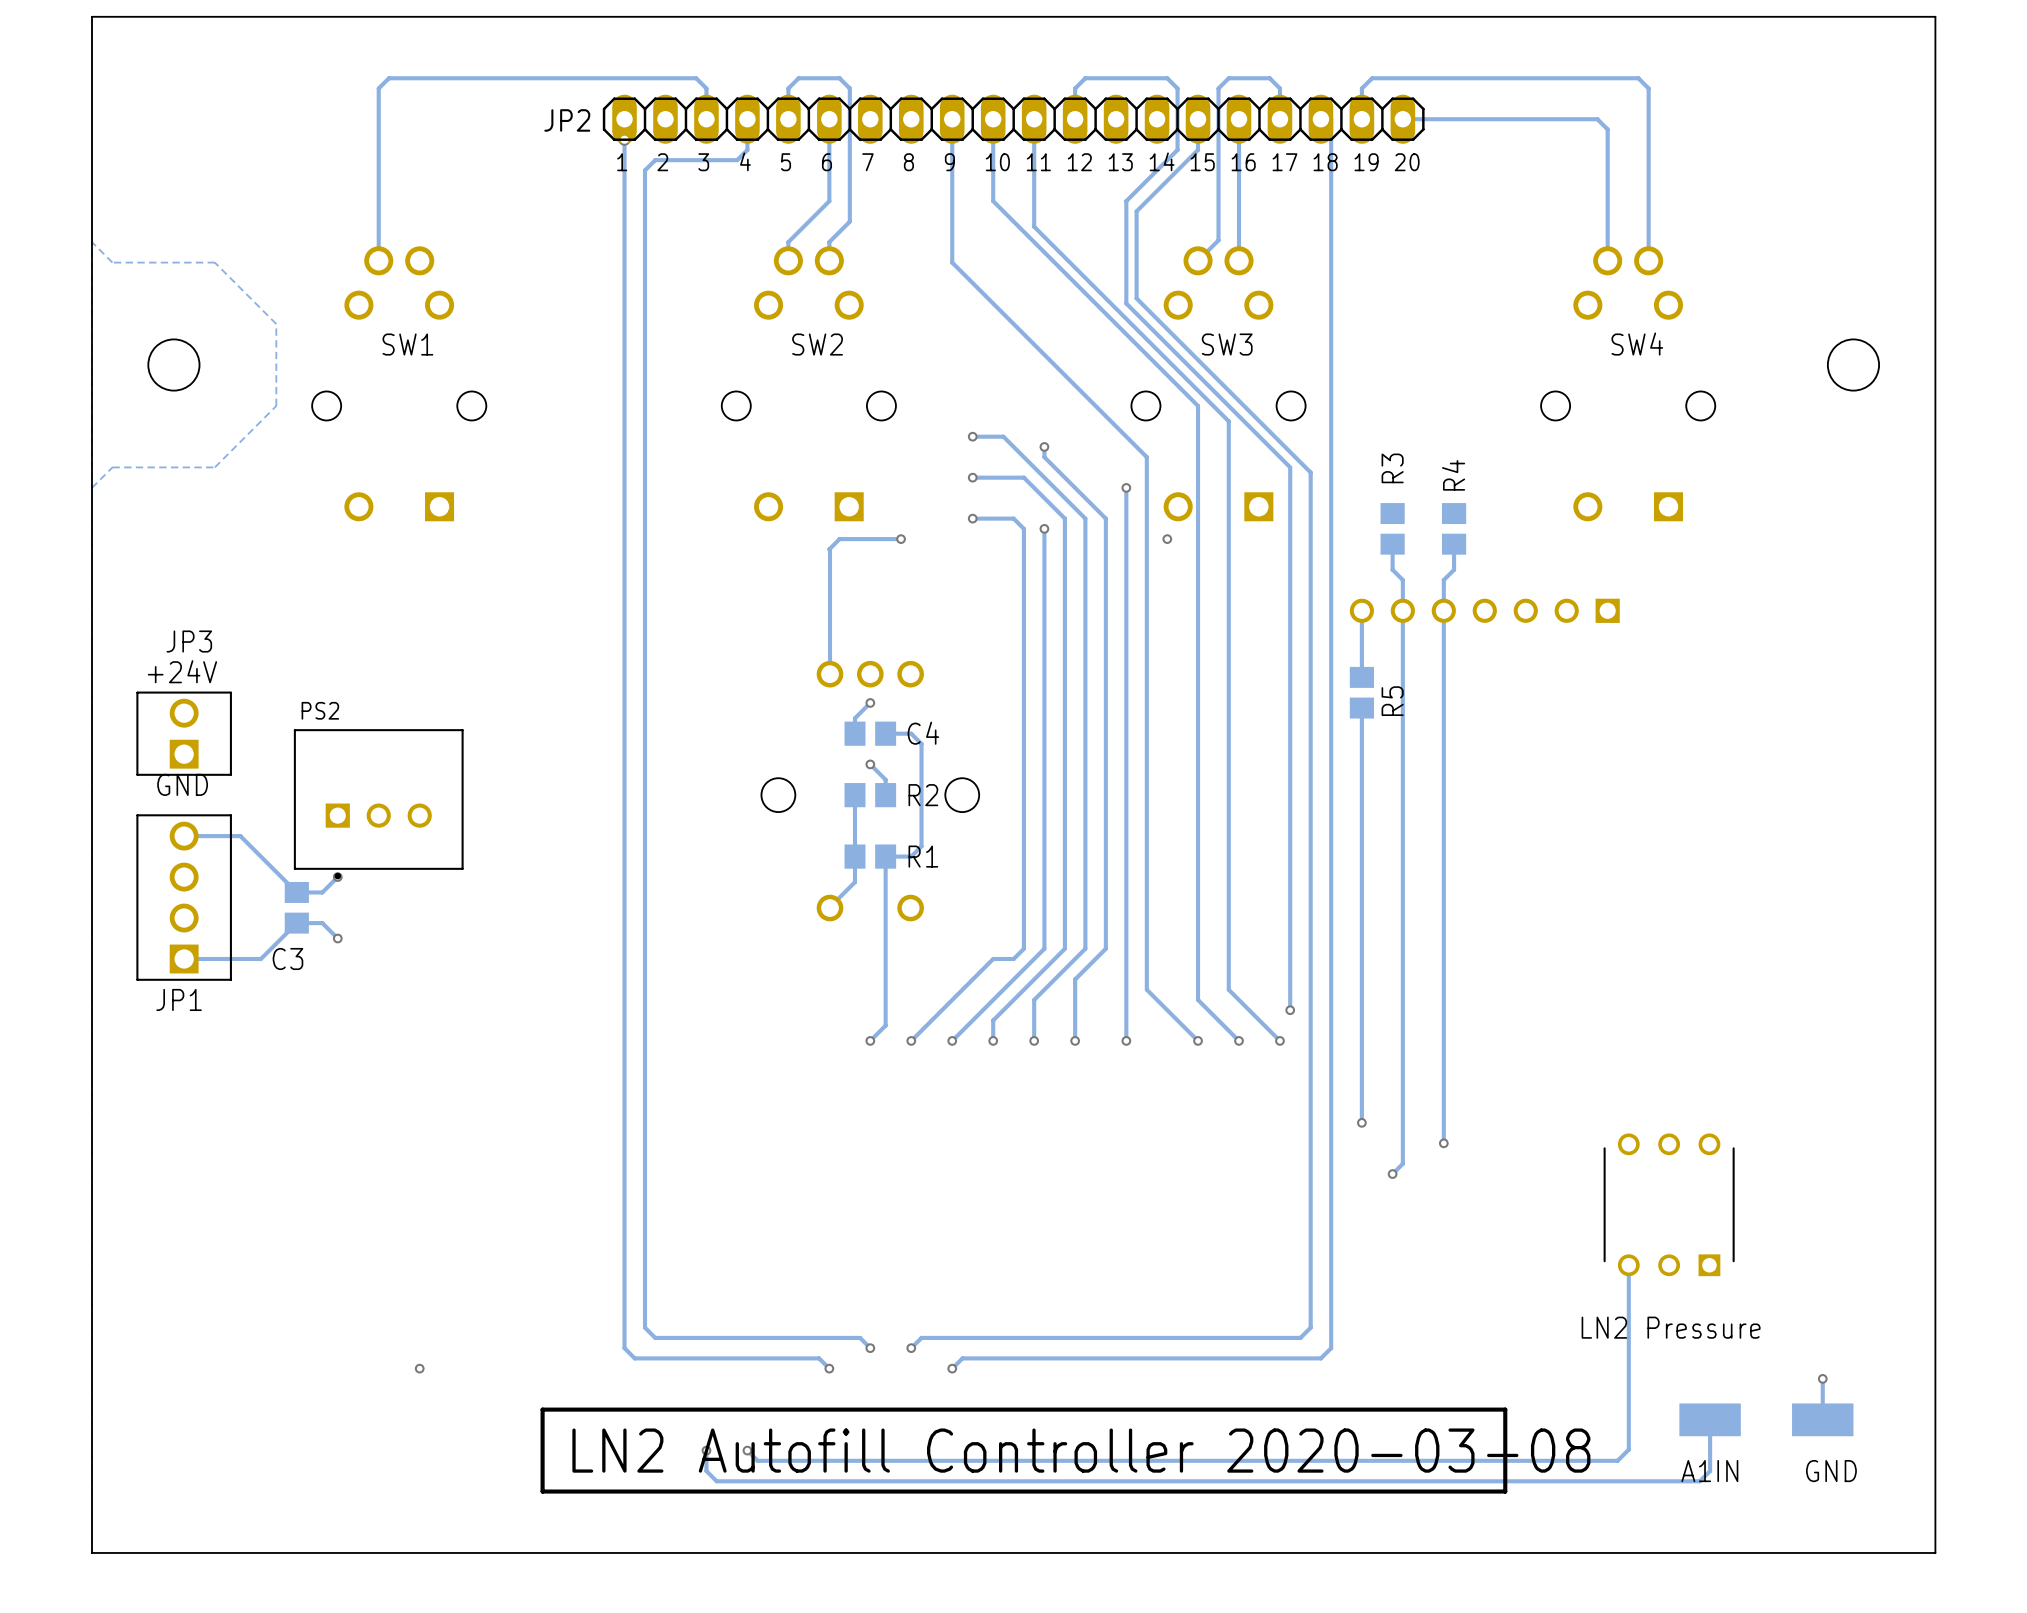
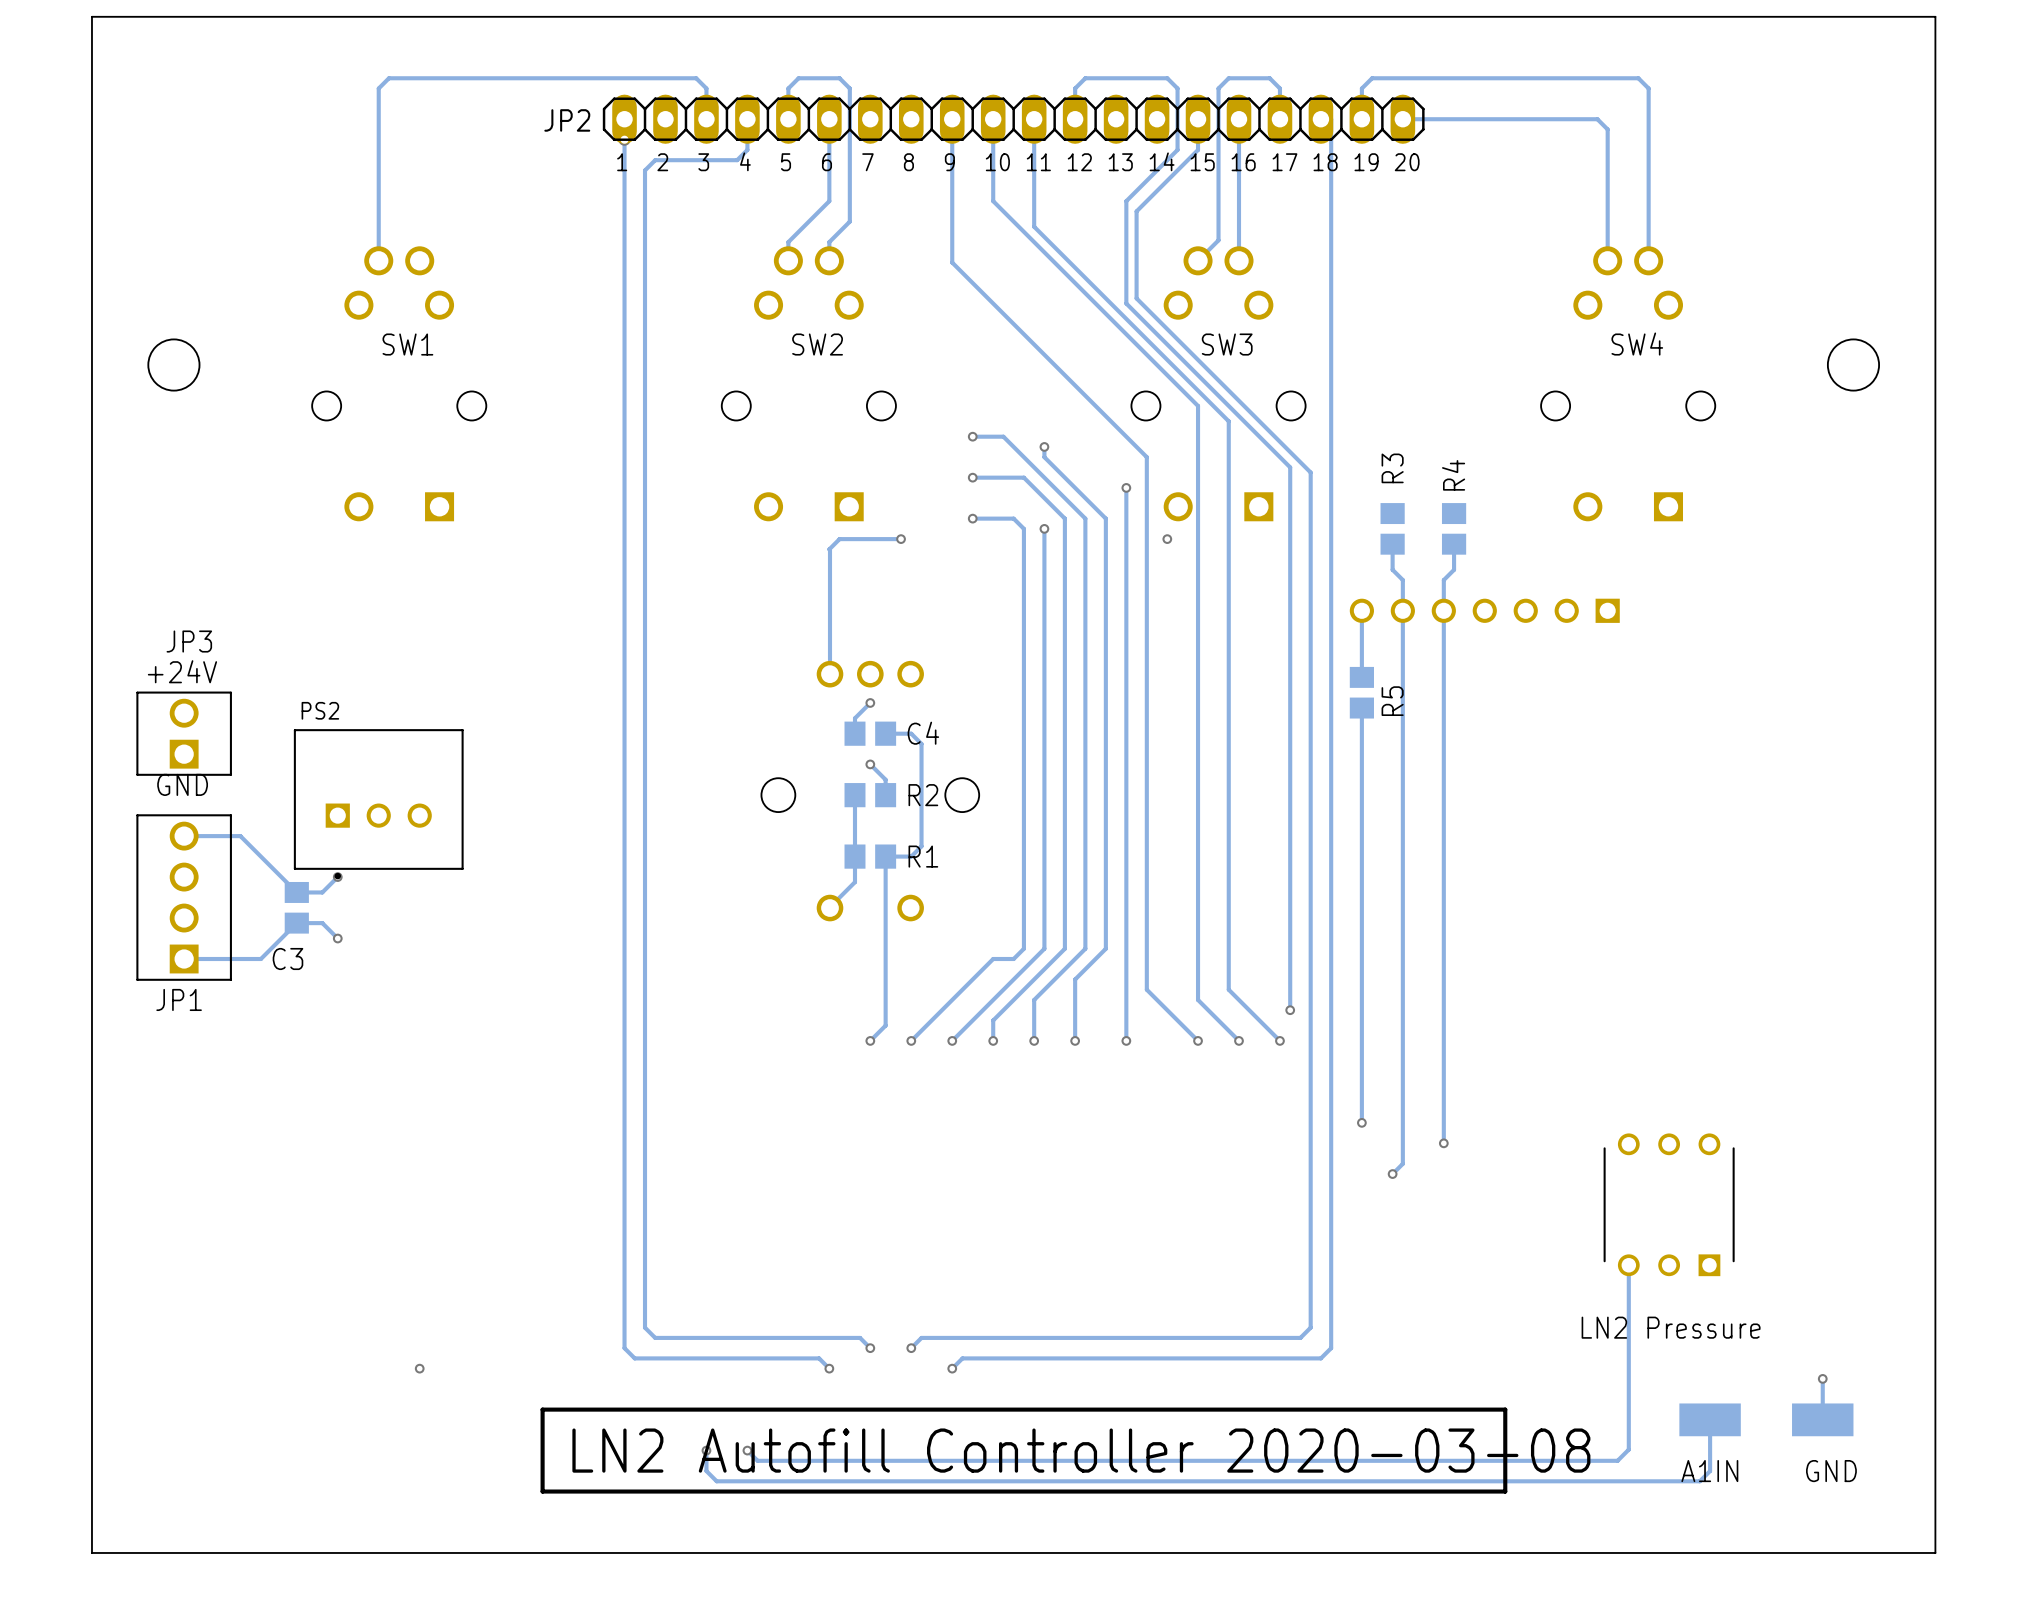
zone outline: (91, 242) (112, 262) (214, 262) (276, 324) (276, 405) (214, 467) (112, 467) (91, 487) -> none

